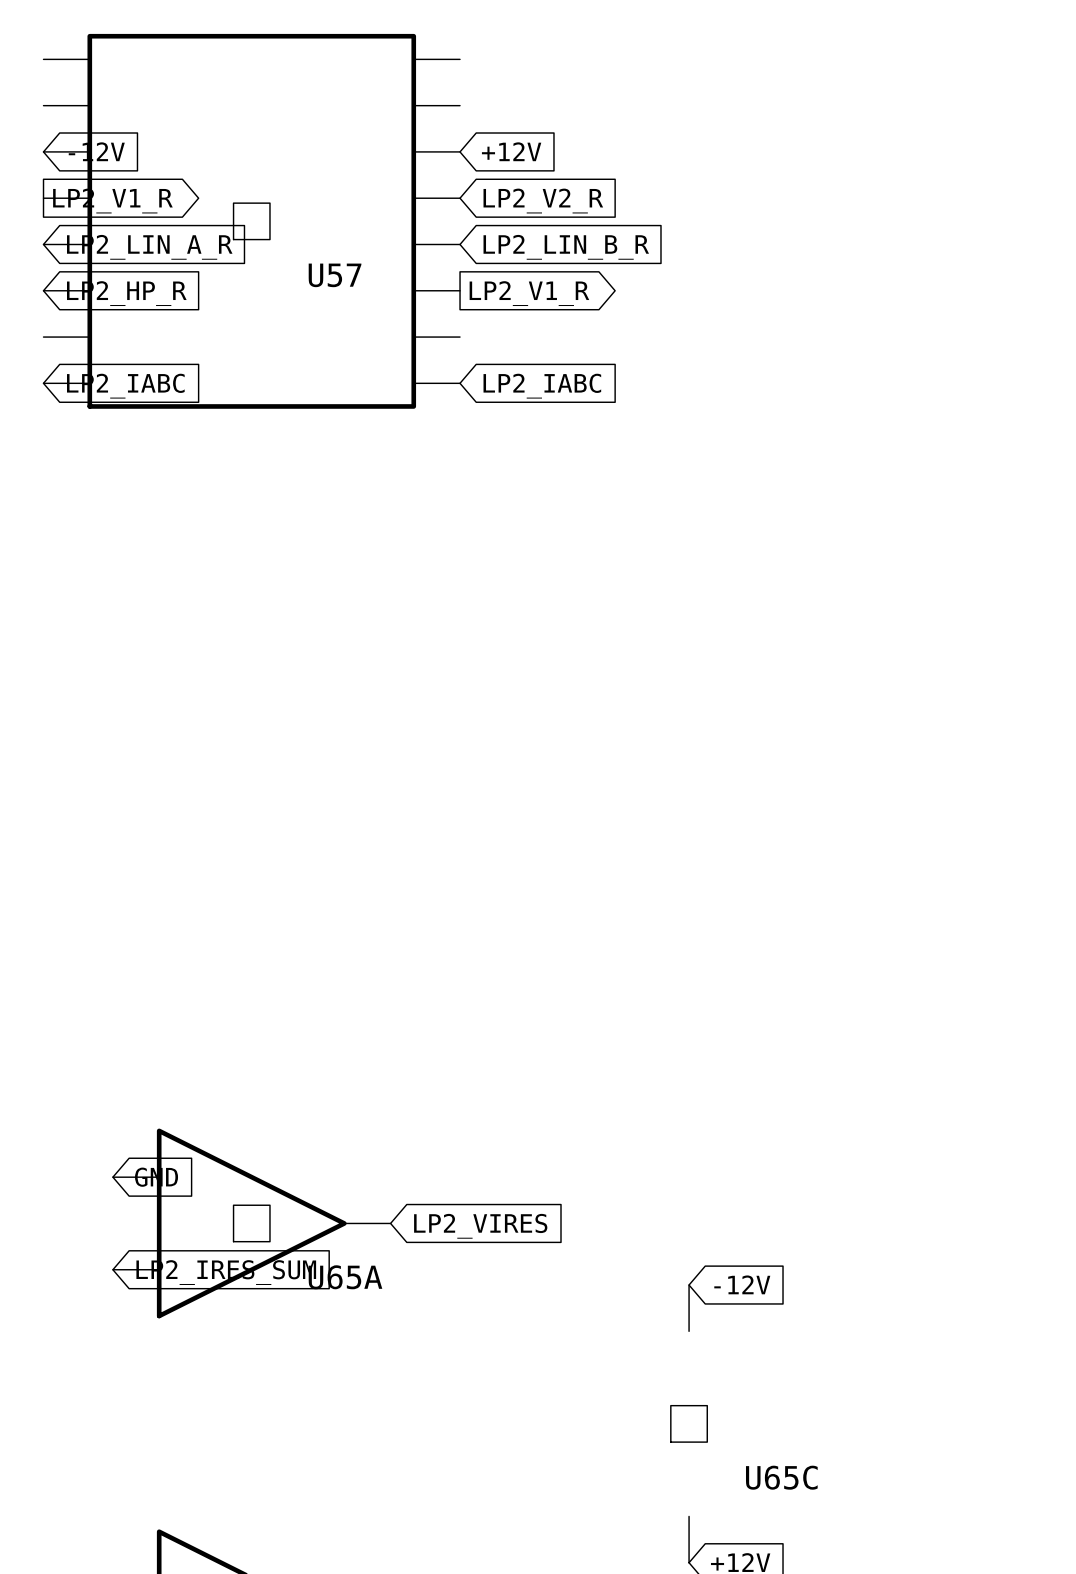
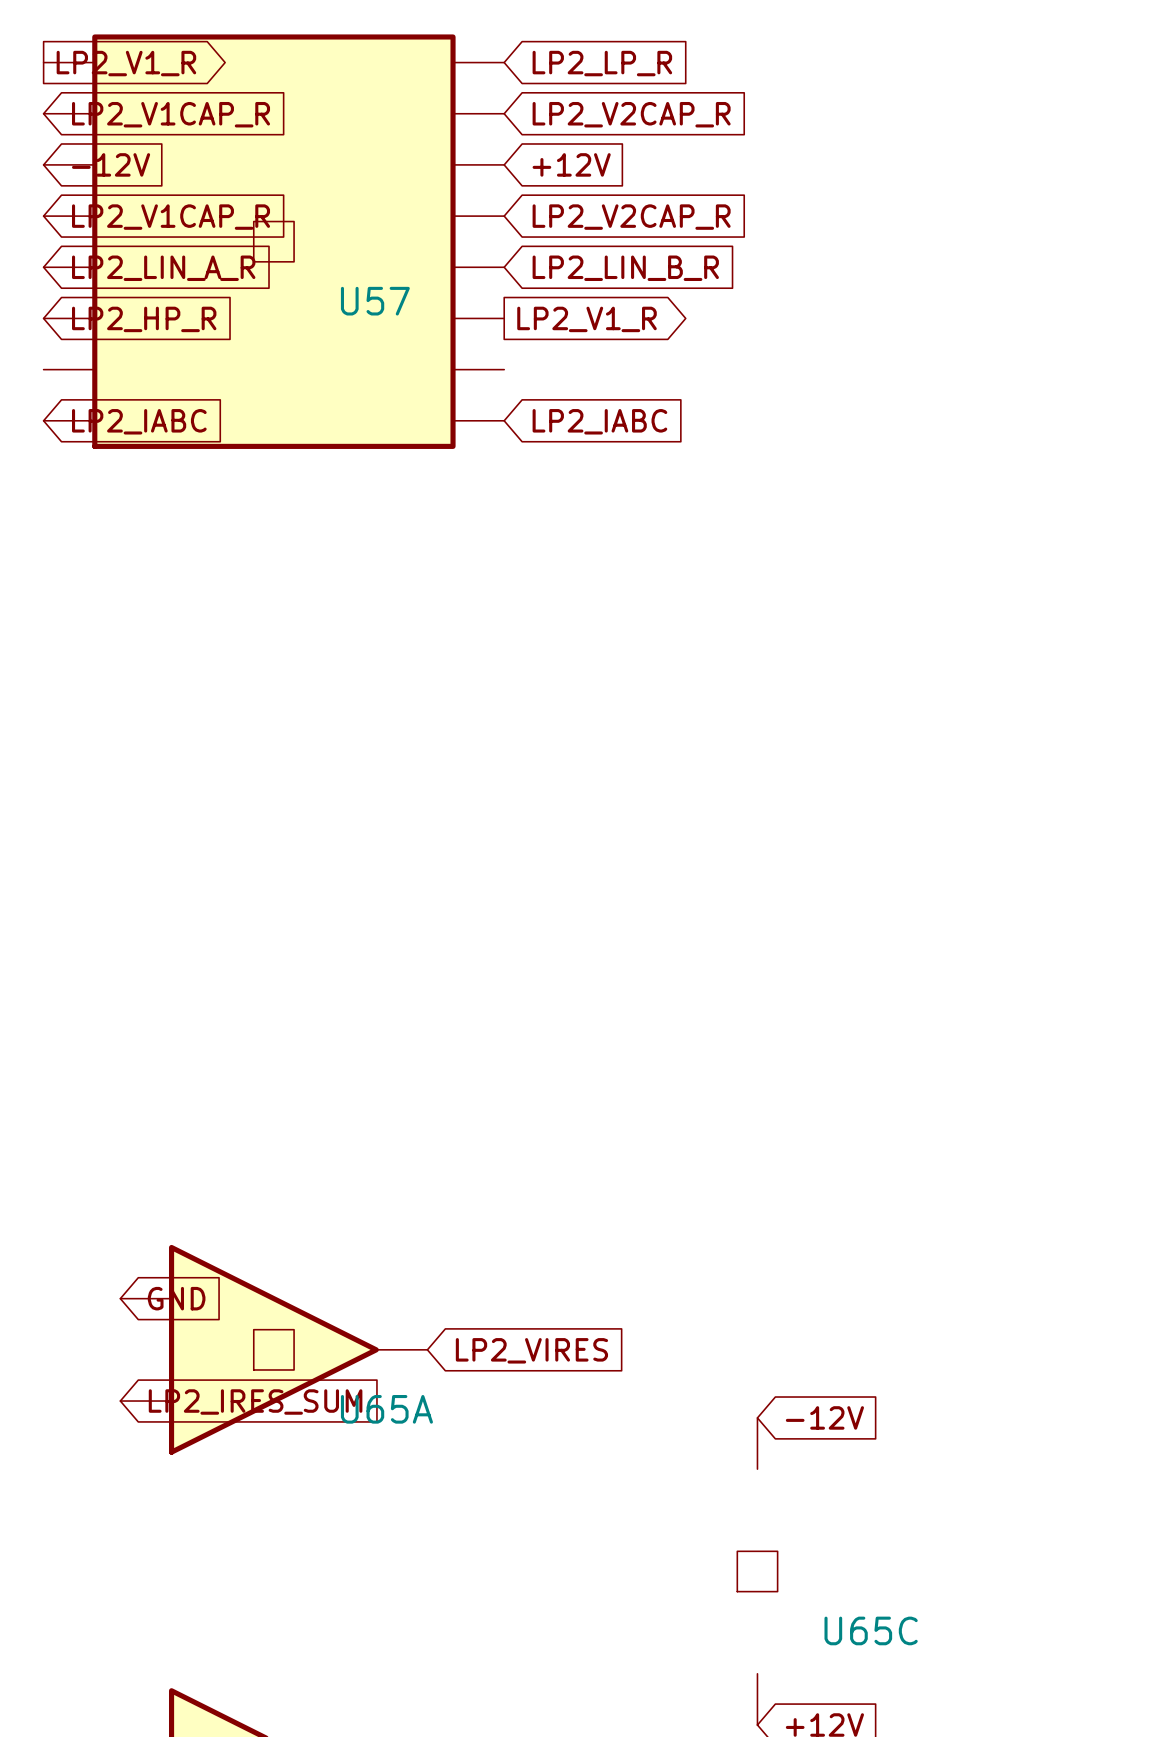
global label: none -> LP2_V1_R (126, 63)
global label: none -> LP2_LP_R (602, 63)
global label: none -> LP2_V1CAP_R (171, 114)
global label: none -> LP2_V2CAP_R (631, 114)
global label shape: output (112, 201) -> input (171, 217)
global label: LP2_V1_R (112, 201) -> LP2_V1CAP_R (171, 217)
global label: LP2_V2_R (543, 201) -> LP2_V2CAP_R (631, 217)

